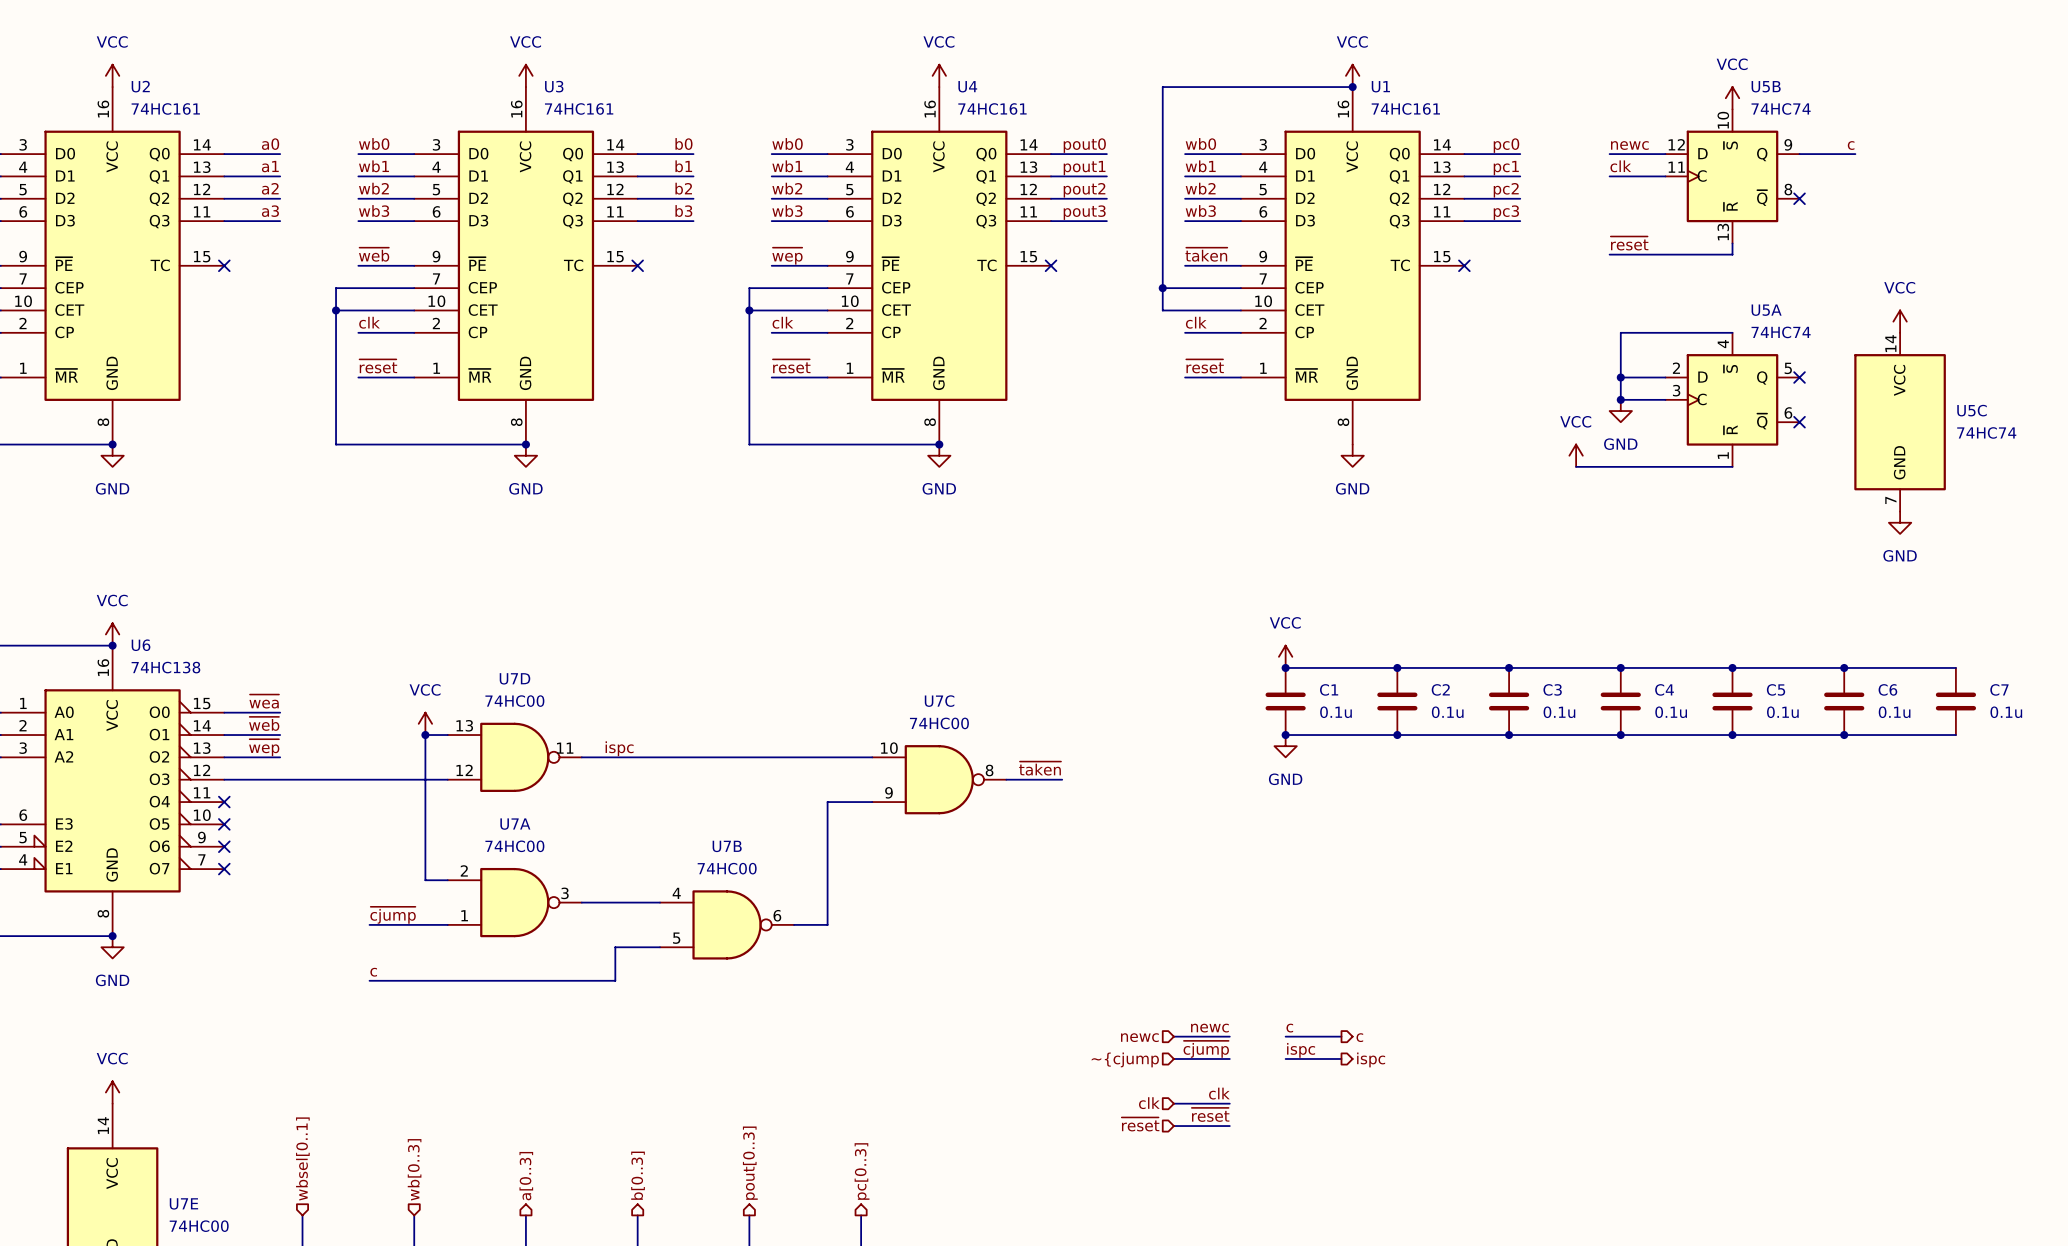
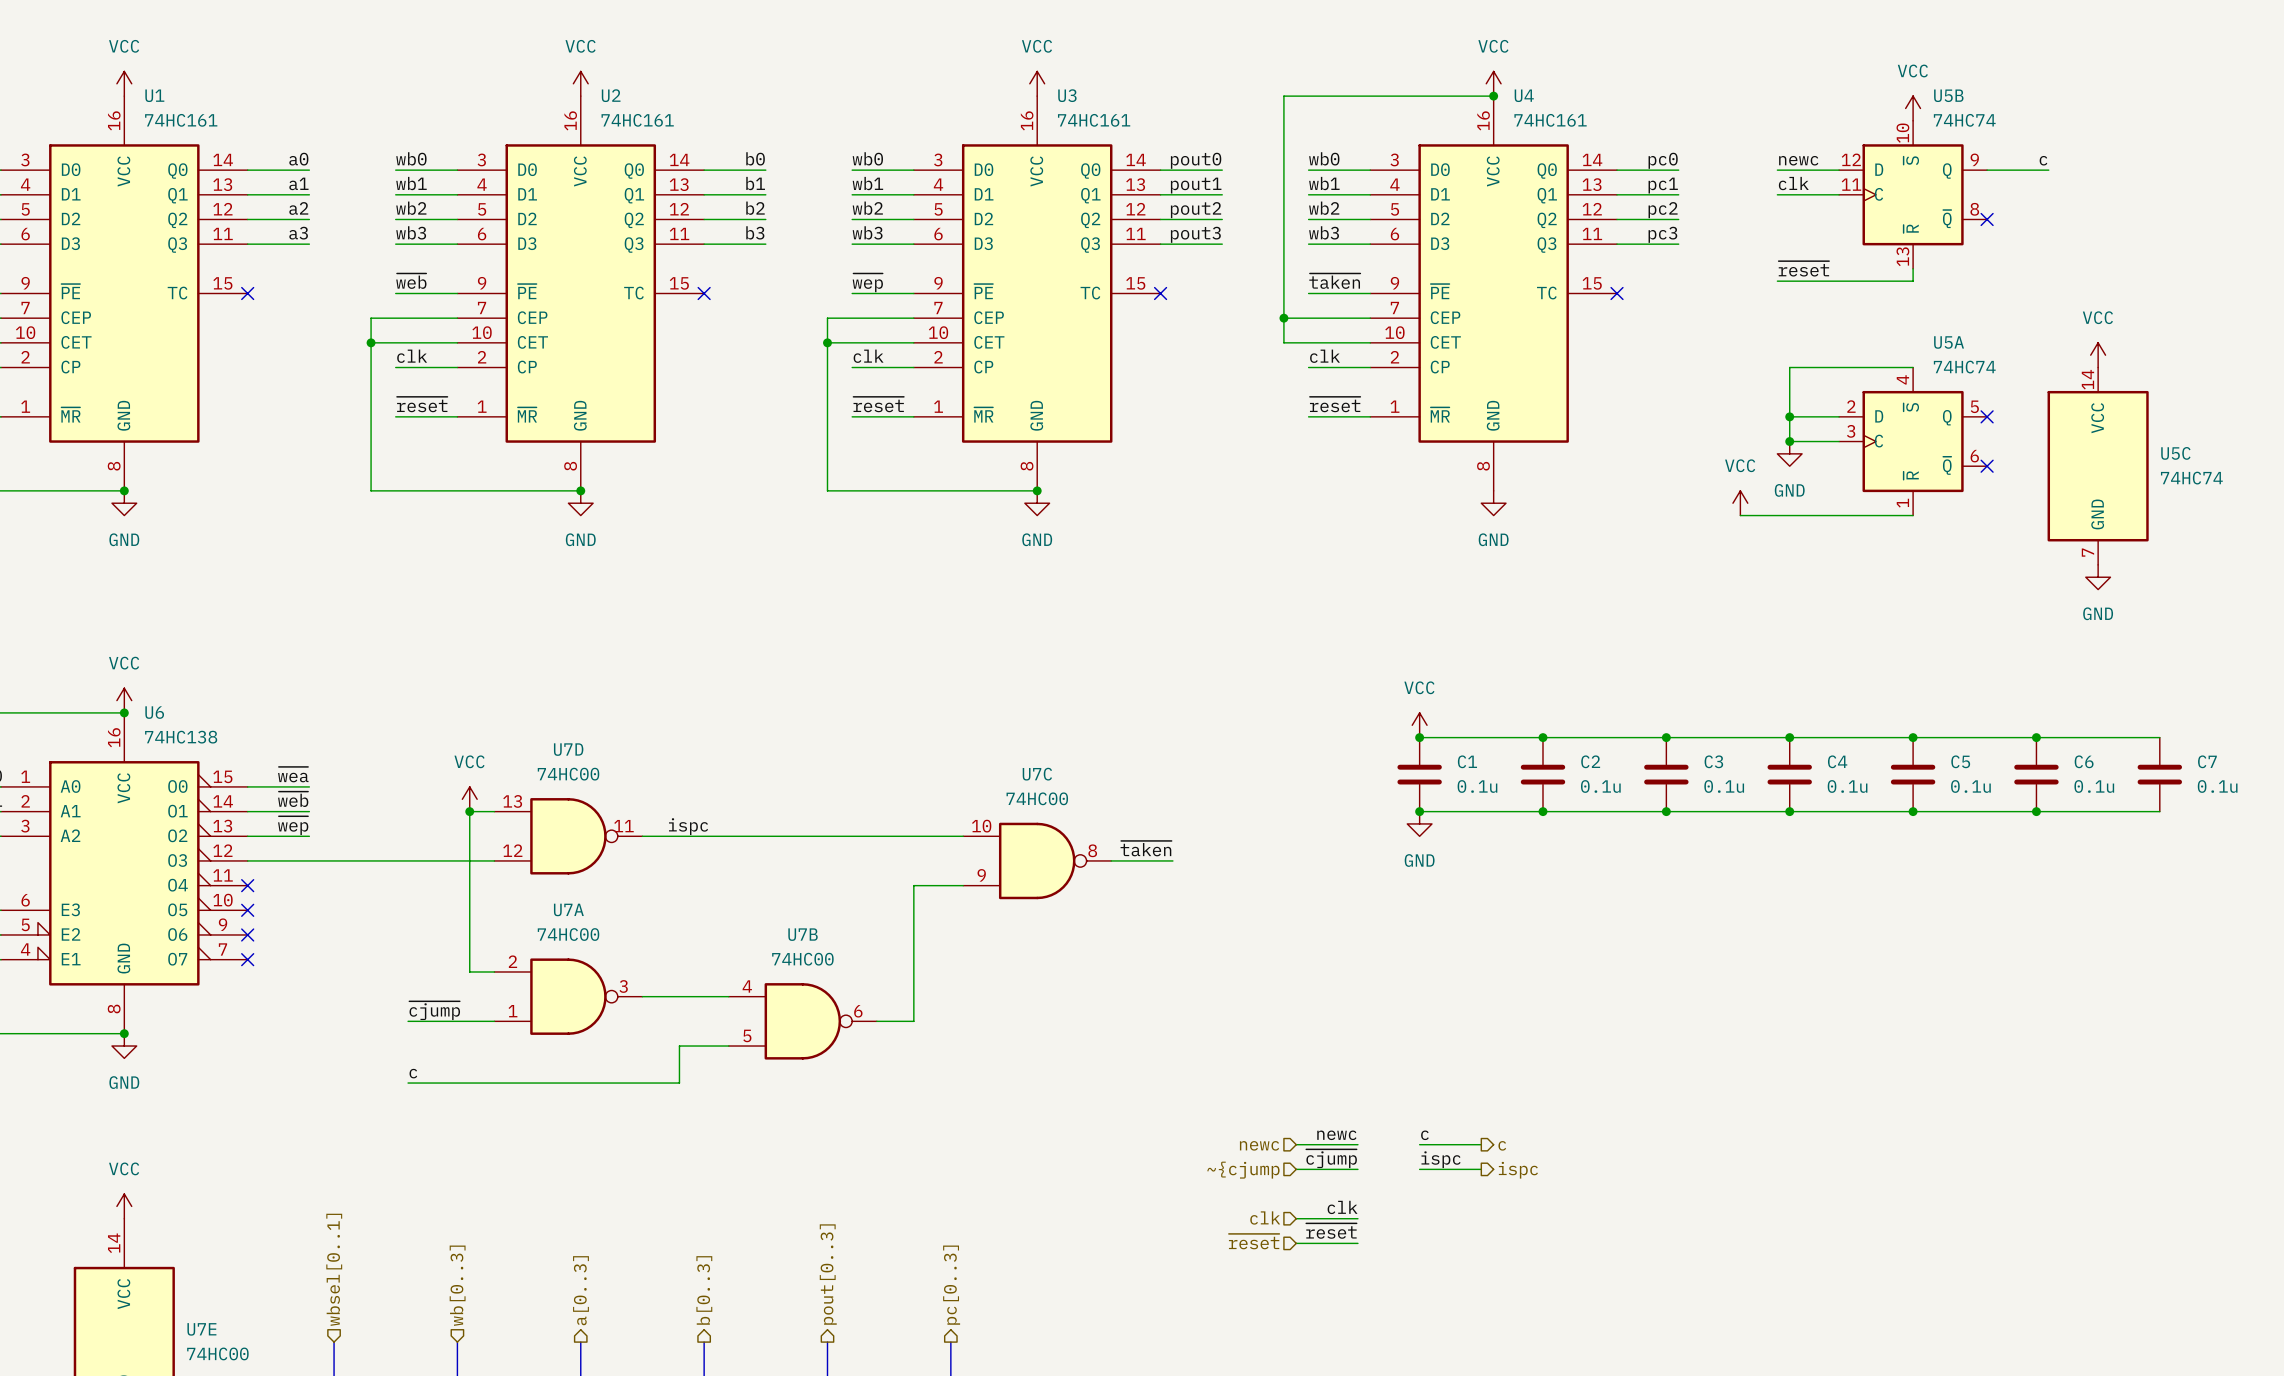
U2 name: U2 (140, 86) -> U1 (154, 95)
U3 name: U3 (554, 86) -> U2 (611, 95)
U4 name: U4 (967, 86) -> U3 (1067, 95)
U1 name: U1 (1380, 86) -> U4 (1524, 95)

